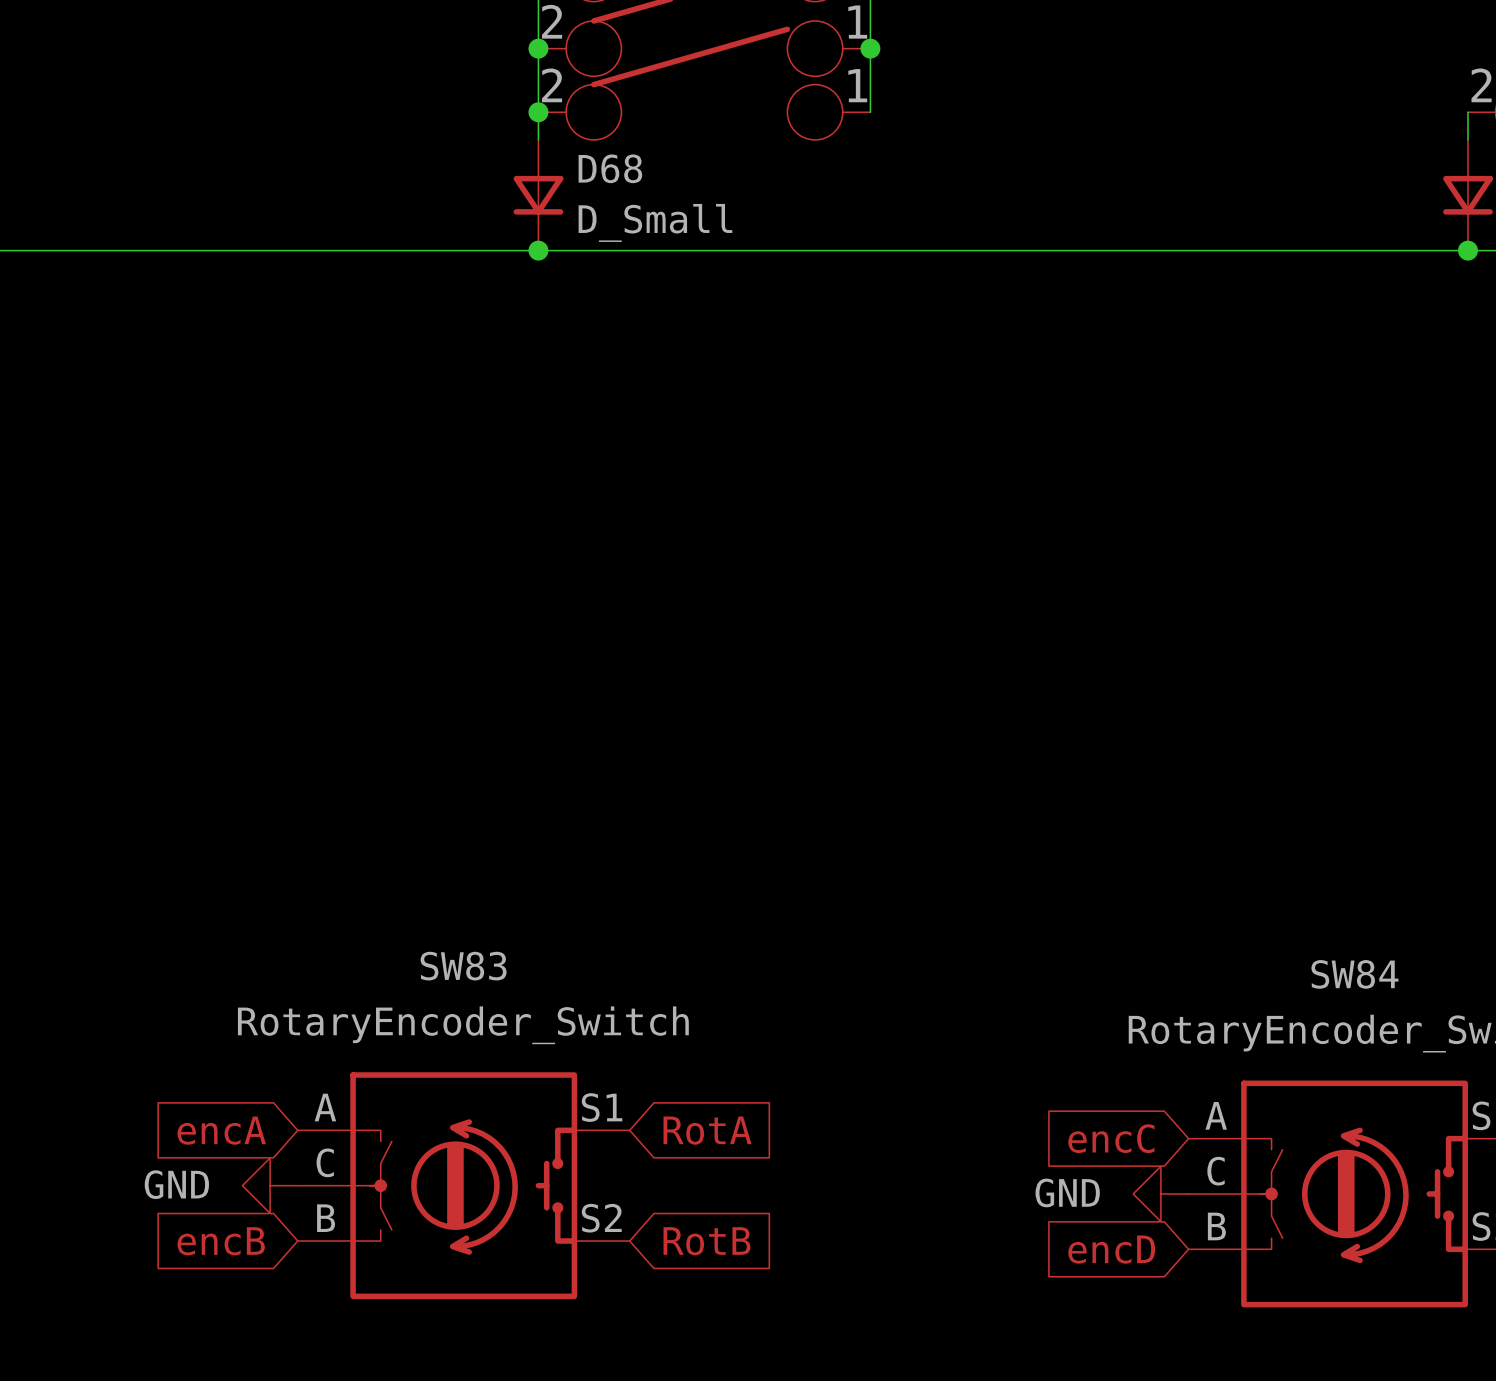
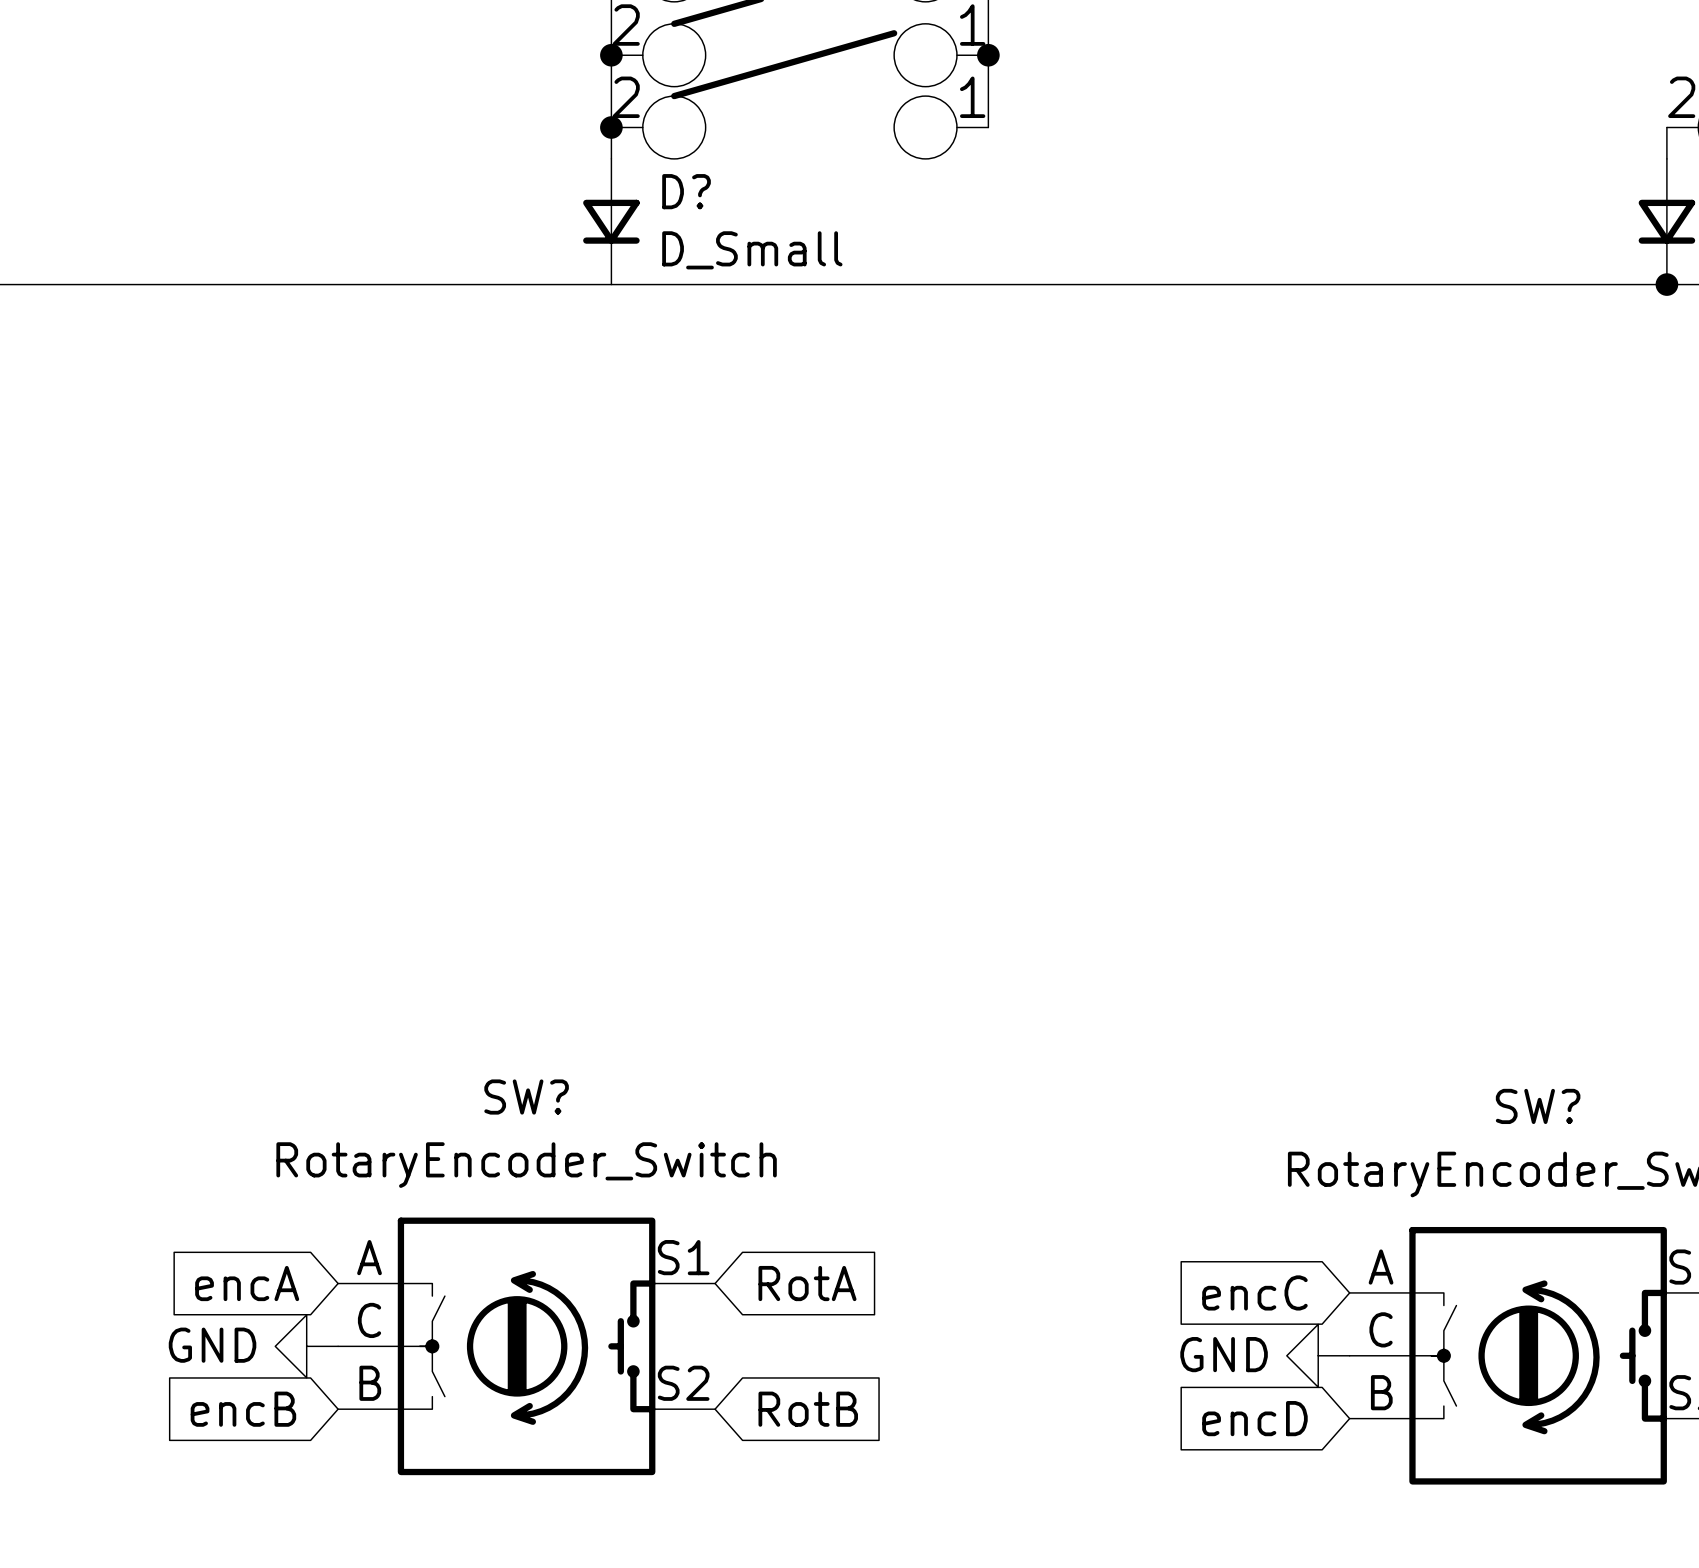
D68 name: D68 (610, 168) -> D? (686, 191)
junction: (538, 250) -> none
SW83 name: SW83 (463, 966) -> SW? (526, 1097)
SW84 name: SW84 (1354, 974) -> SW? (1538, 1106)

